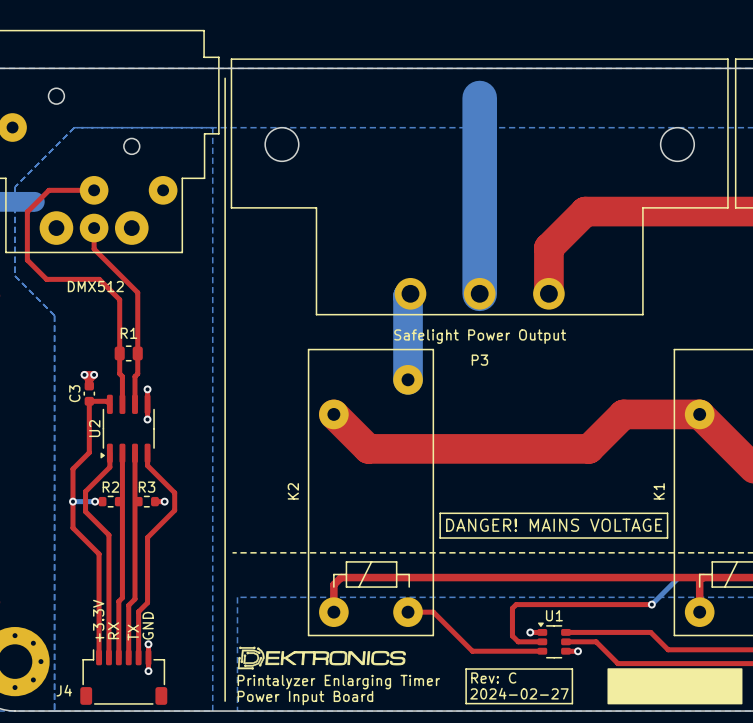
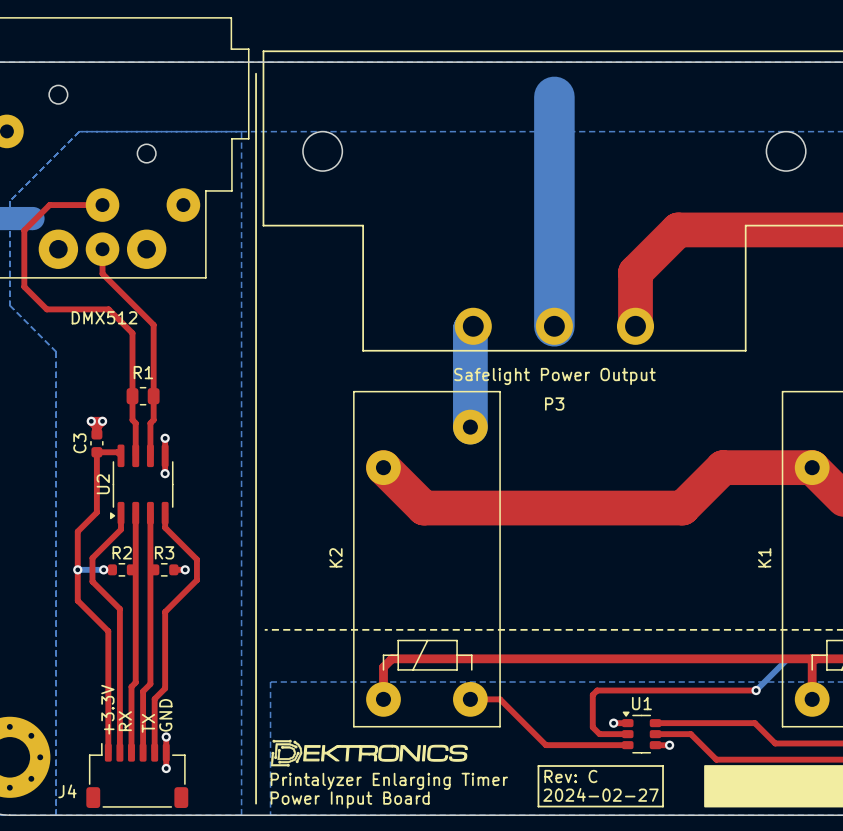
line: (440, 513) (667, 513) (667, 538) (440, 538) (440, 513) -> none
text: DANGER! MAINS VOLTAGE (554, 525) -> none

